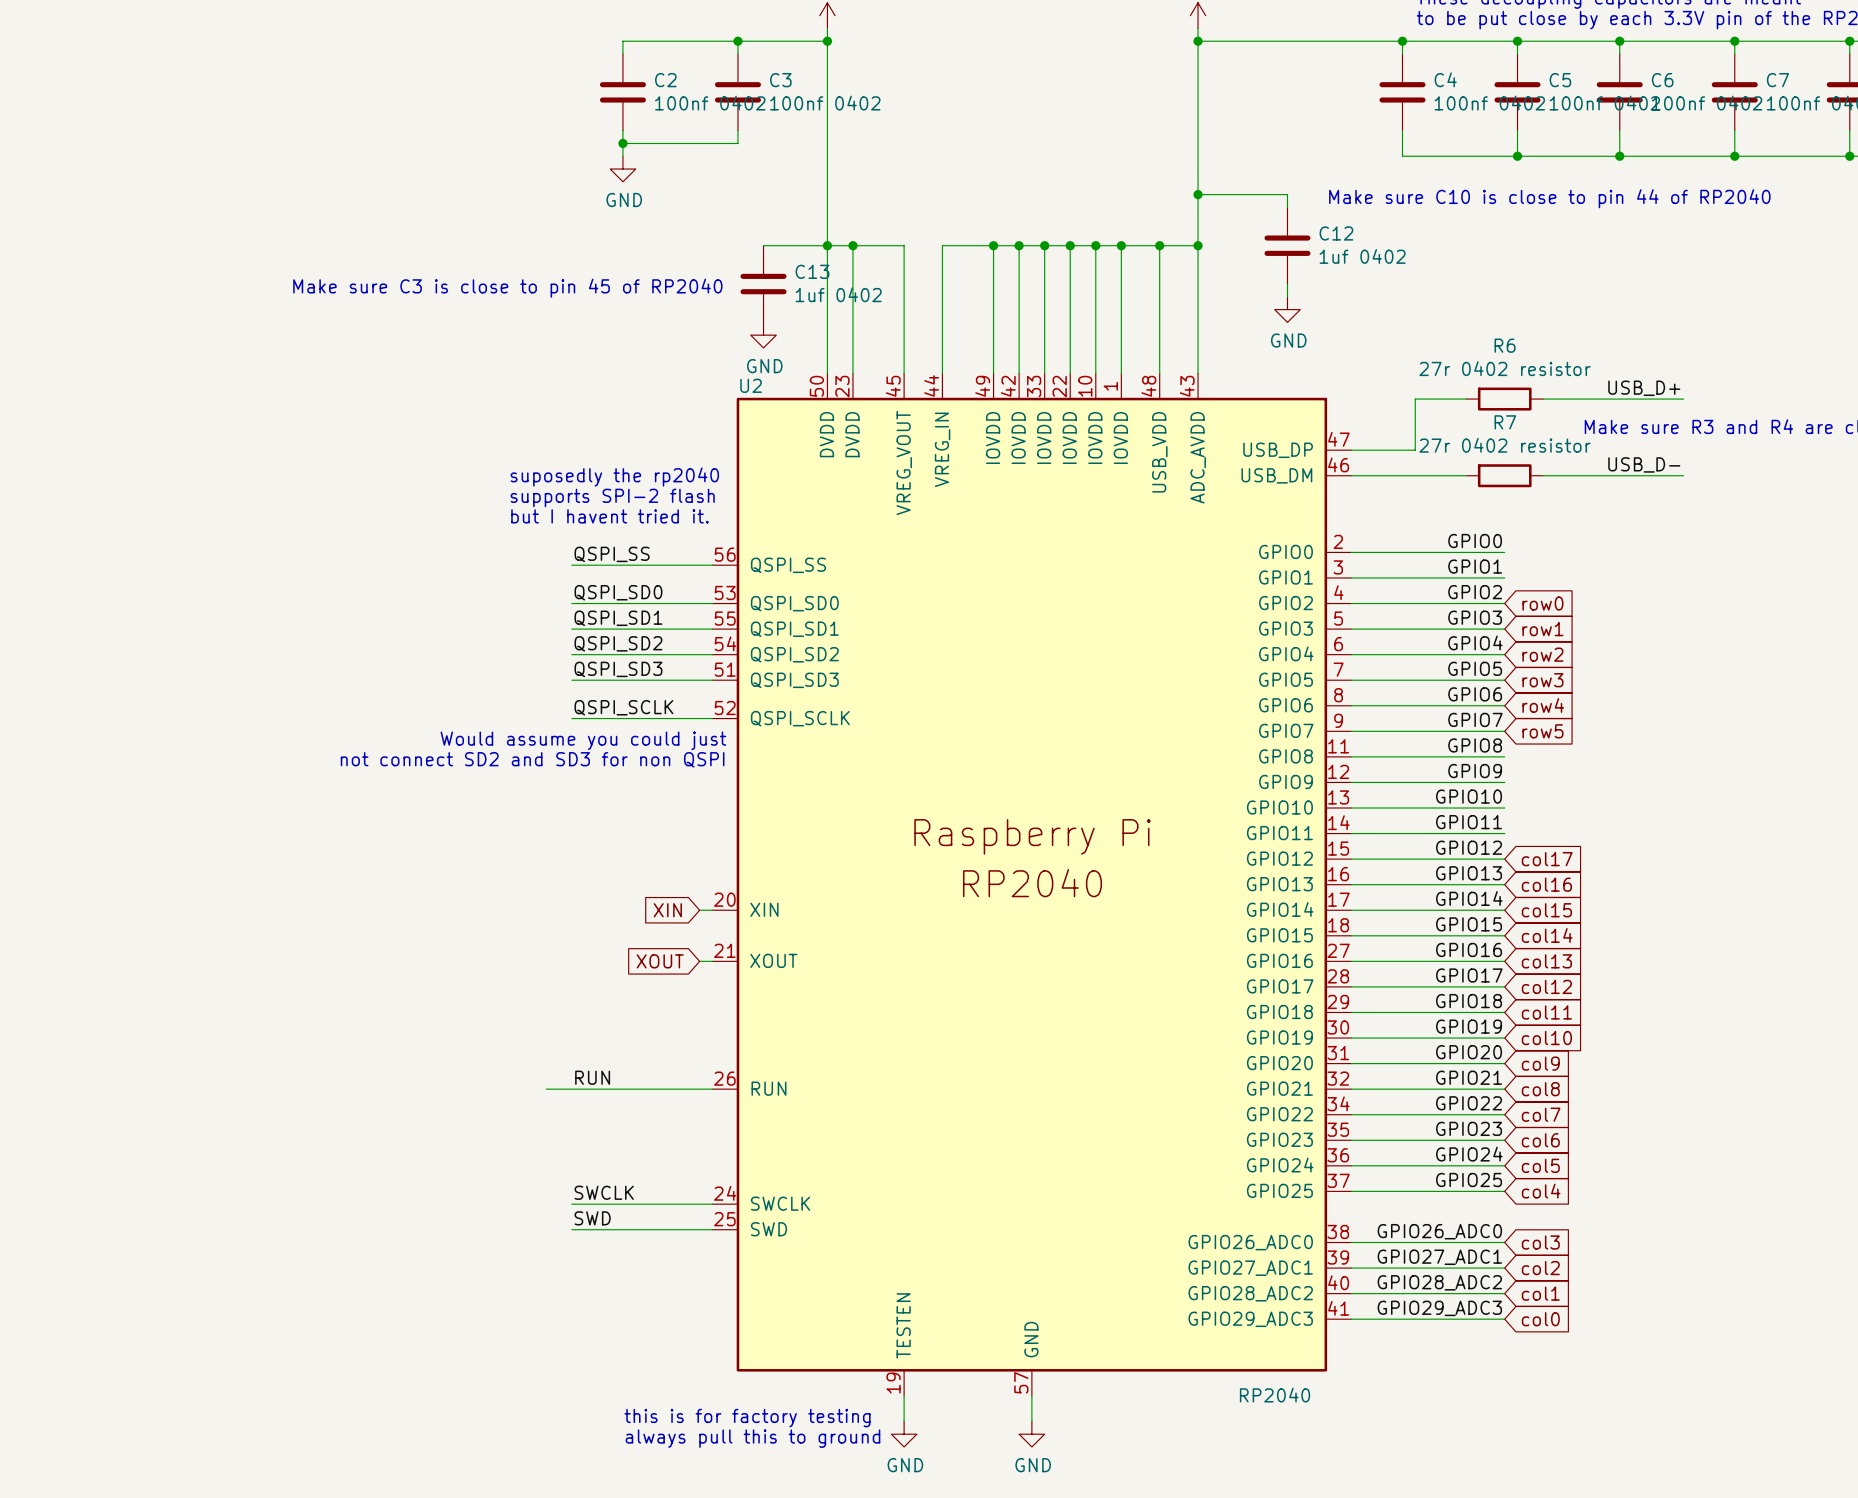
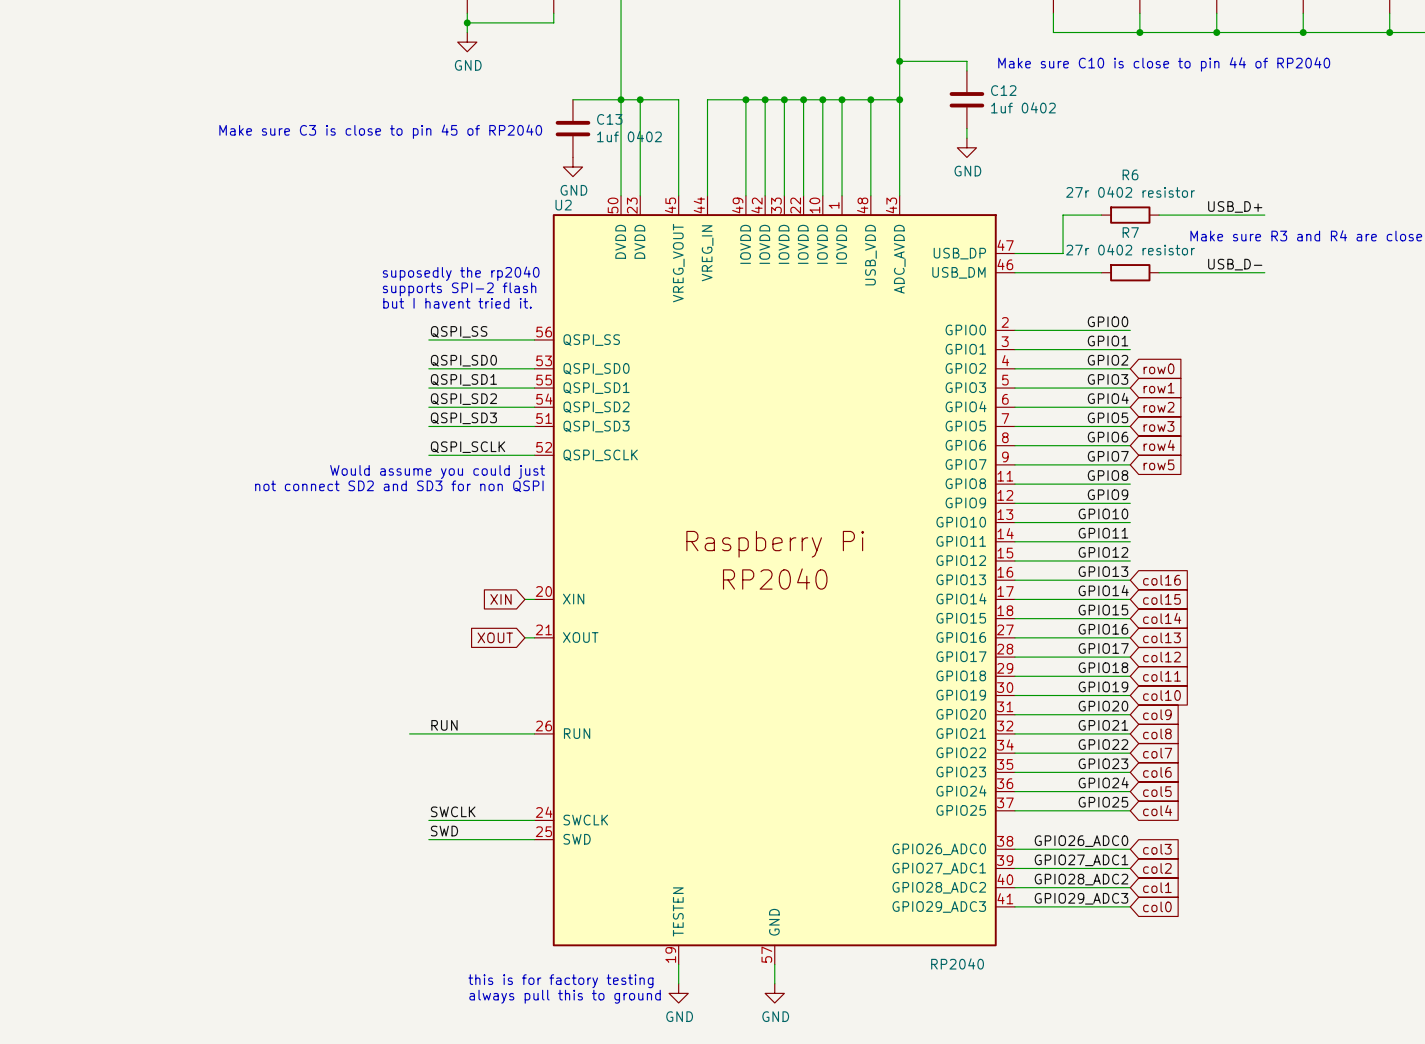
global label: col17 (1547, 859) -> none

